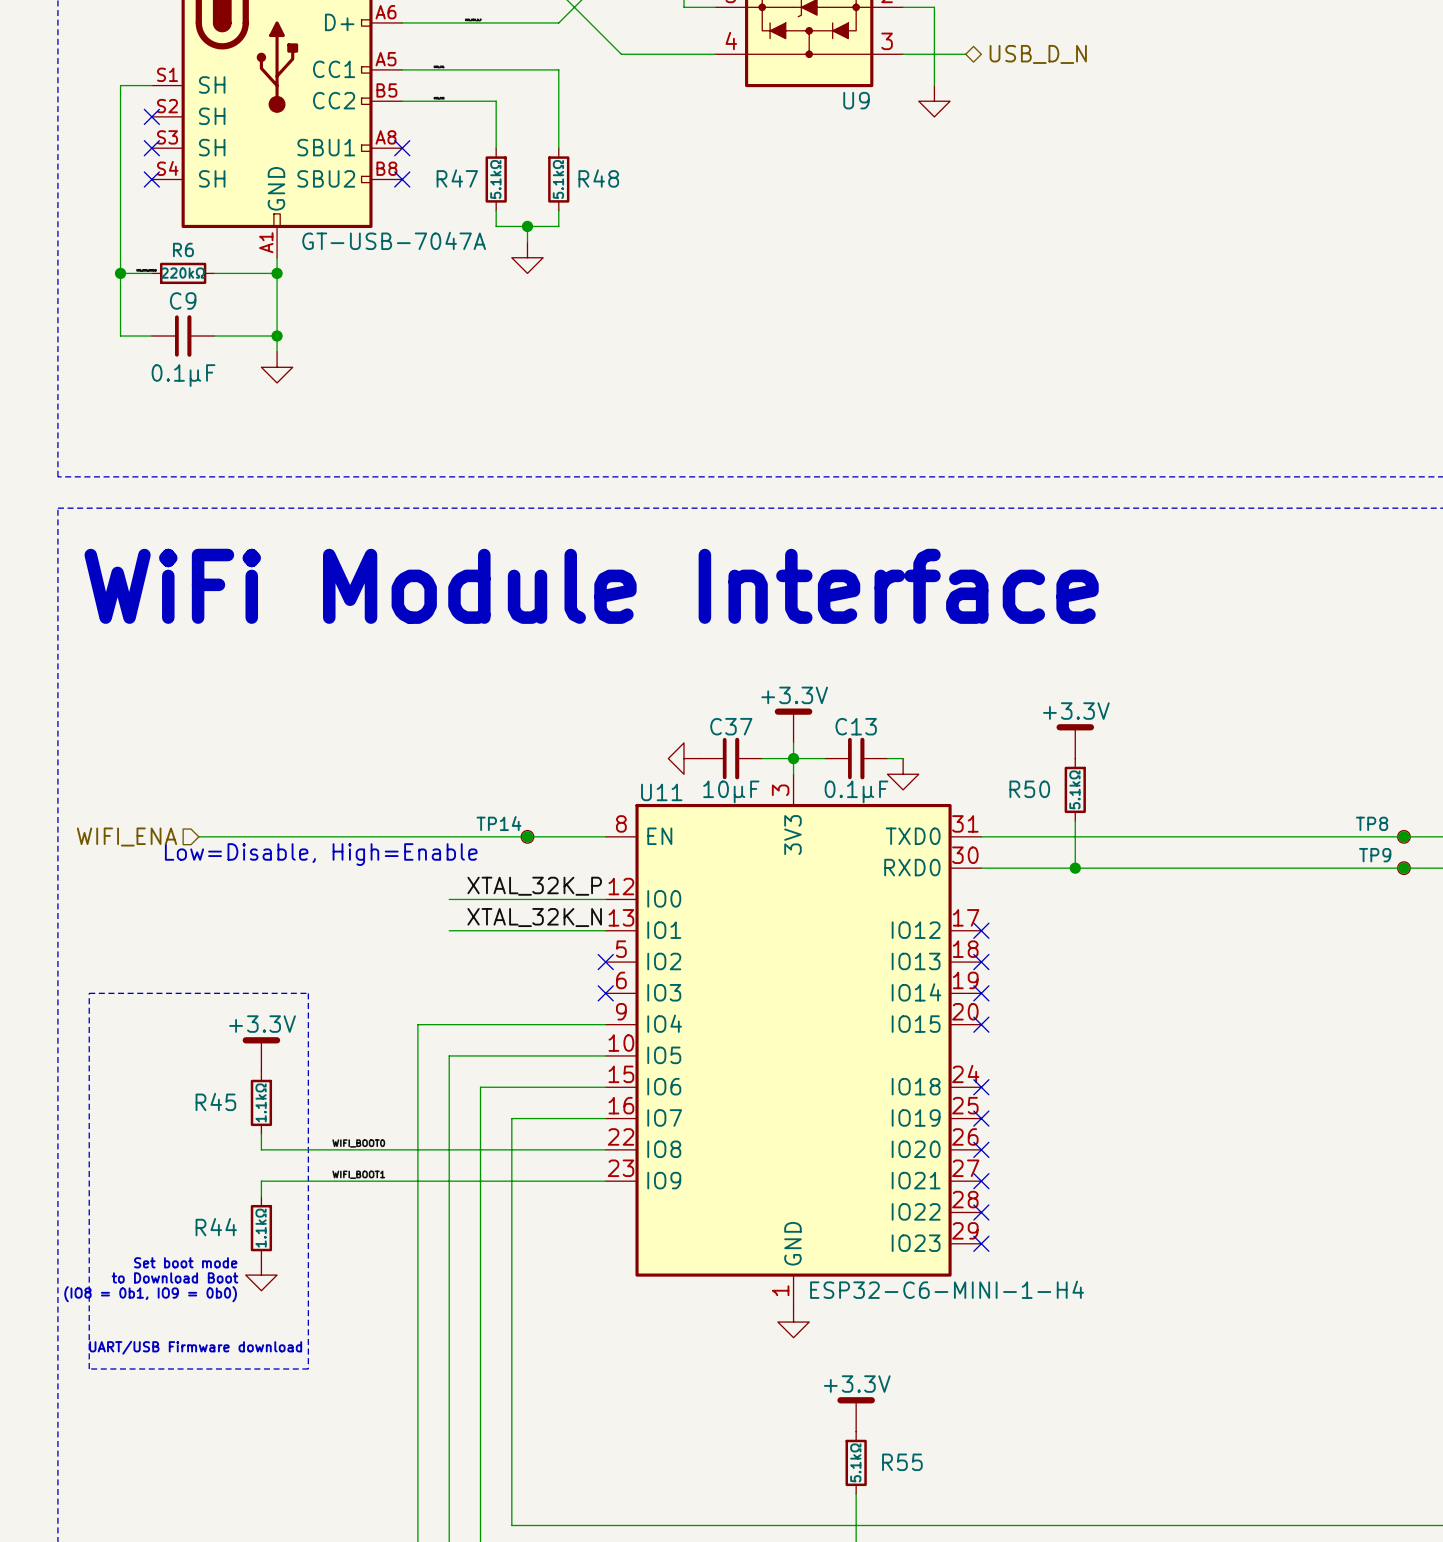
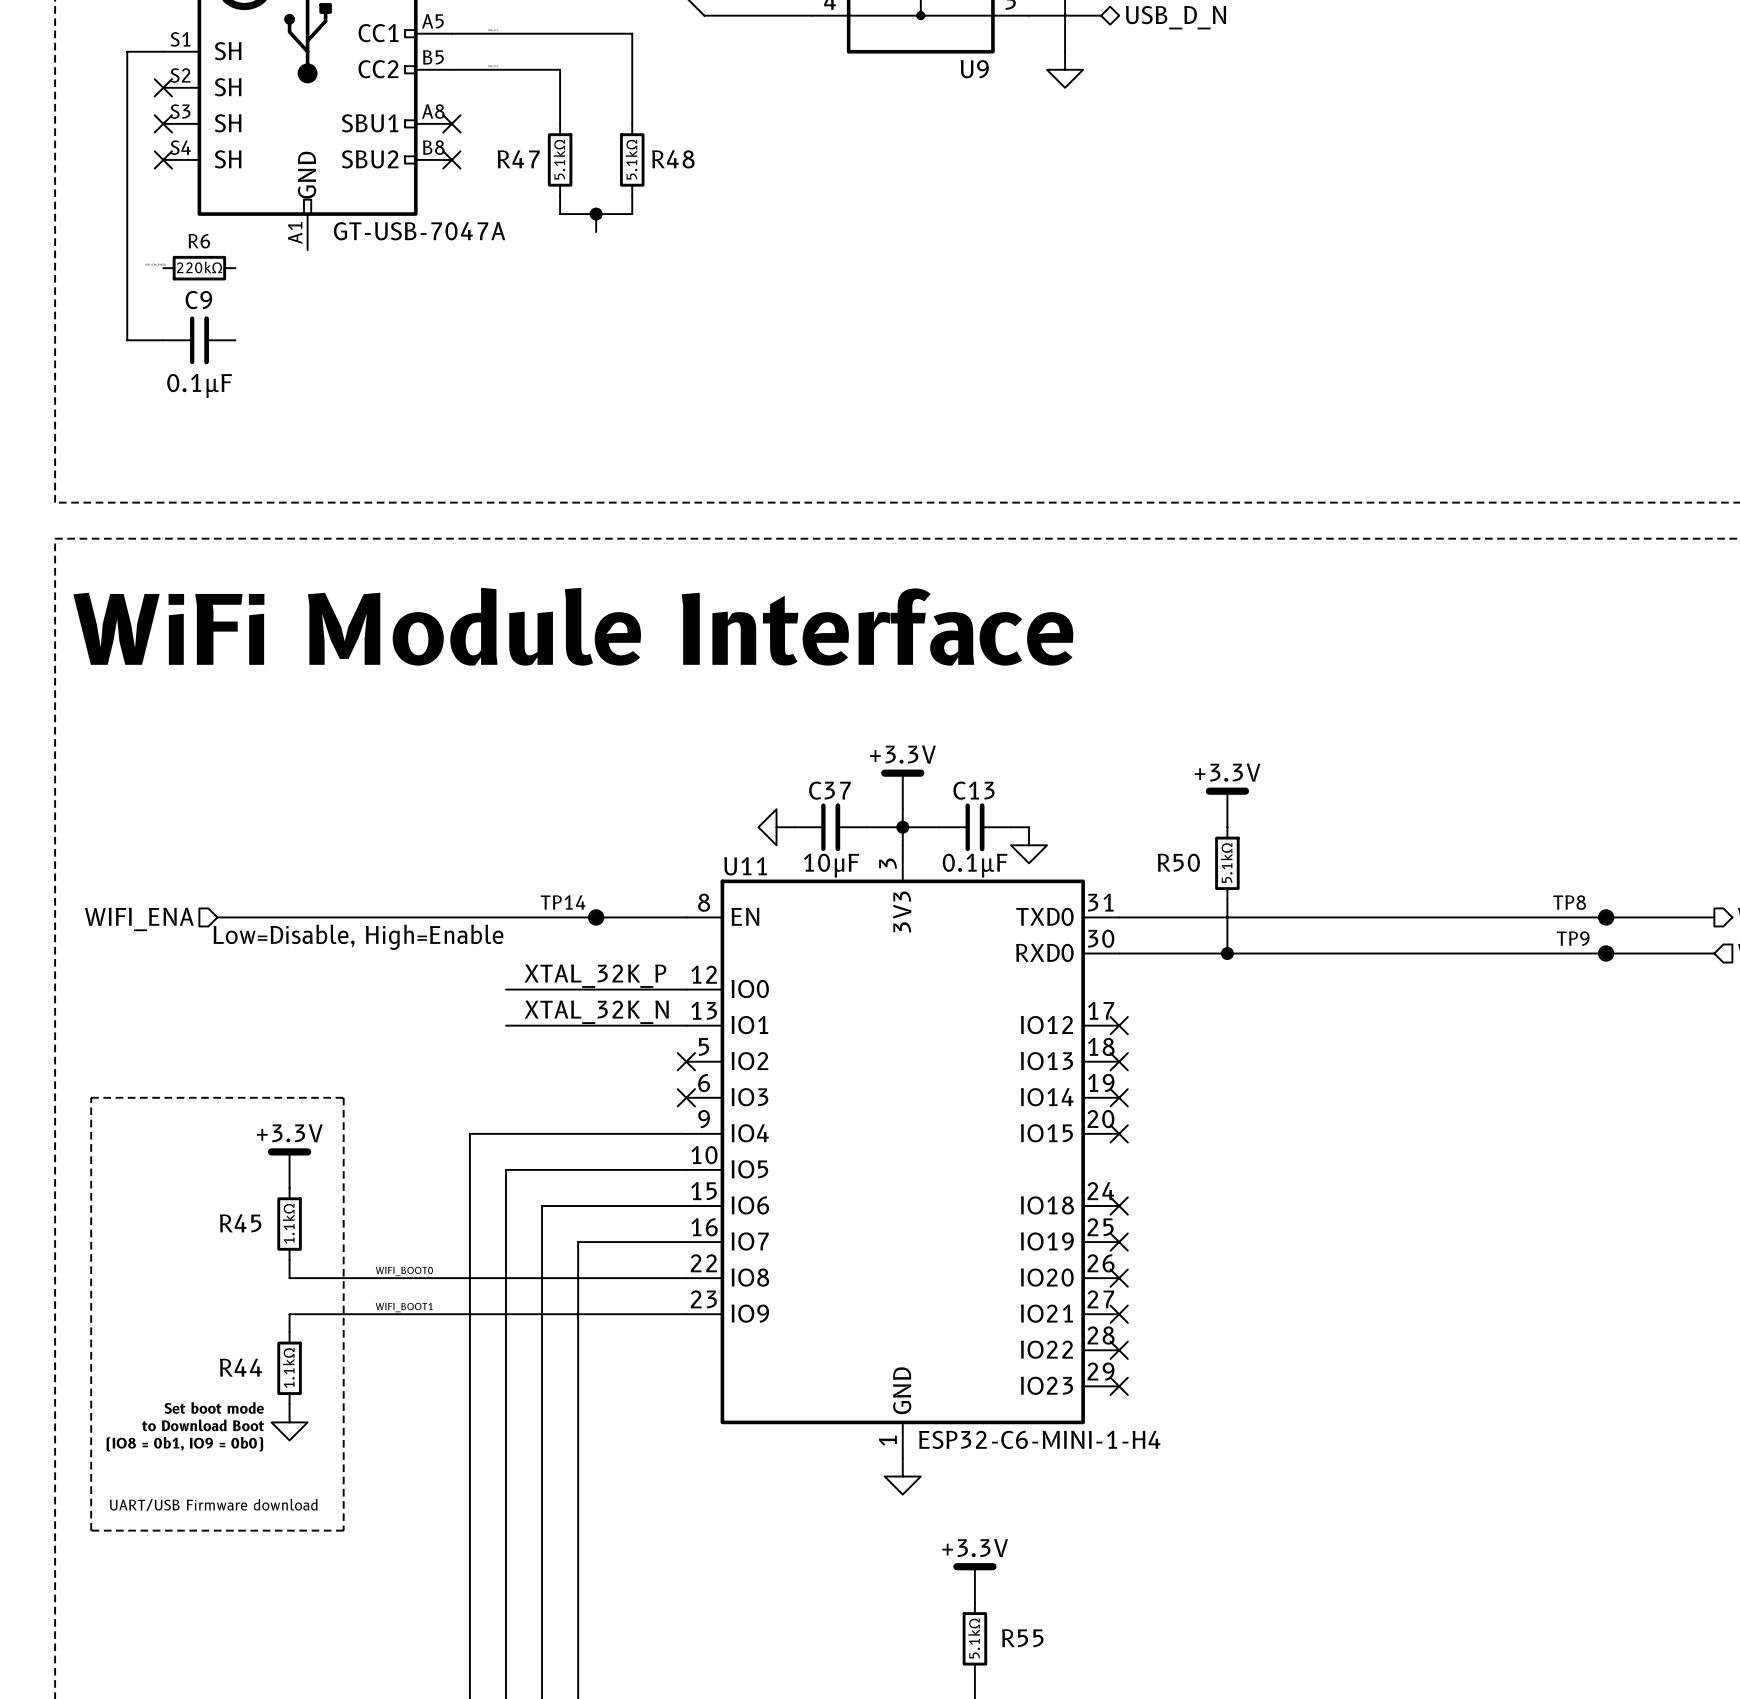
wire: (277, 257) (277, 351) -> none
power symbol: (527, 257) -> none
wire: (120, 273) (151, 273) -> none
junction: (120, 273) -> none
wire: (214, 273) (277, 273) -> none
junction: (277, 273) -> none
wire: (214, 336) (277, 336) -> none
junction: (277, 336) -> none
power symbol: (277, 367) -> none

